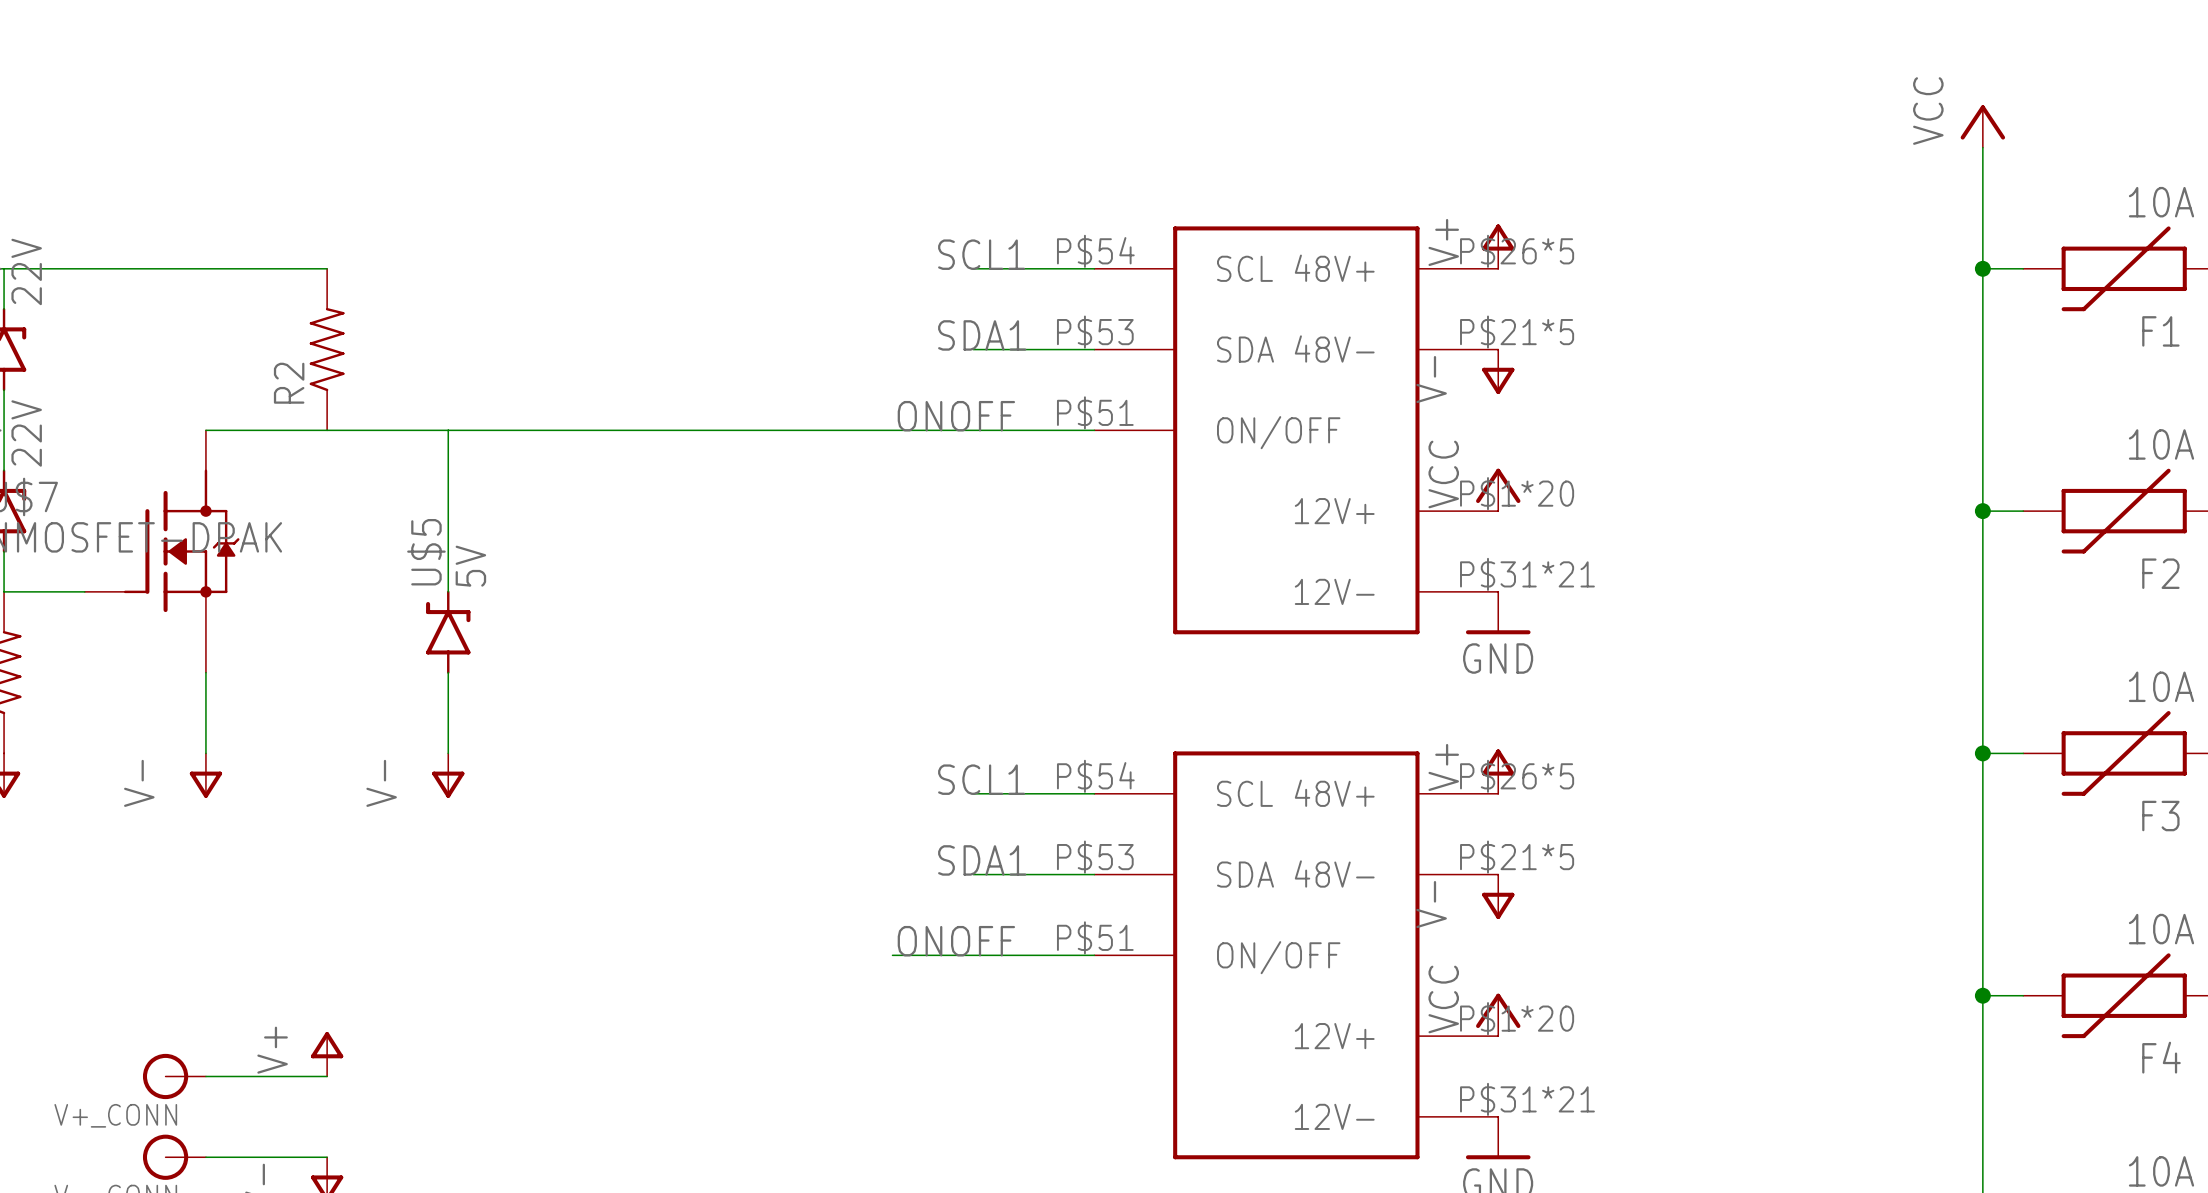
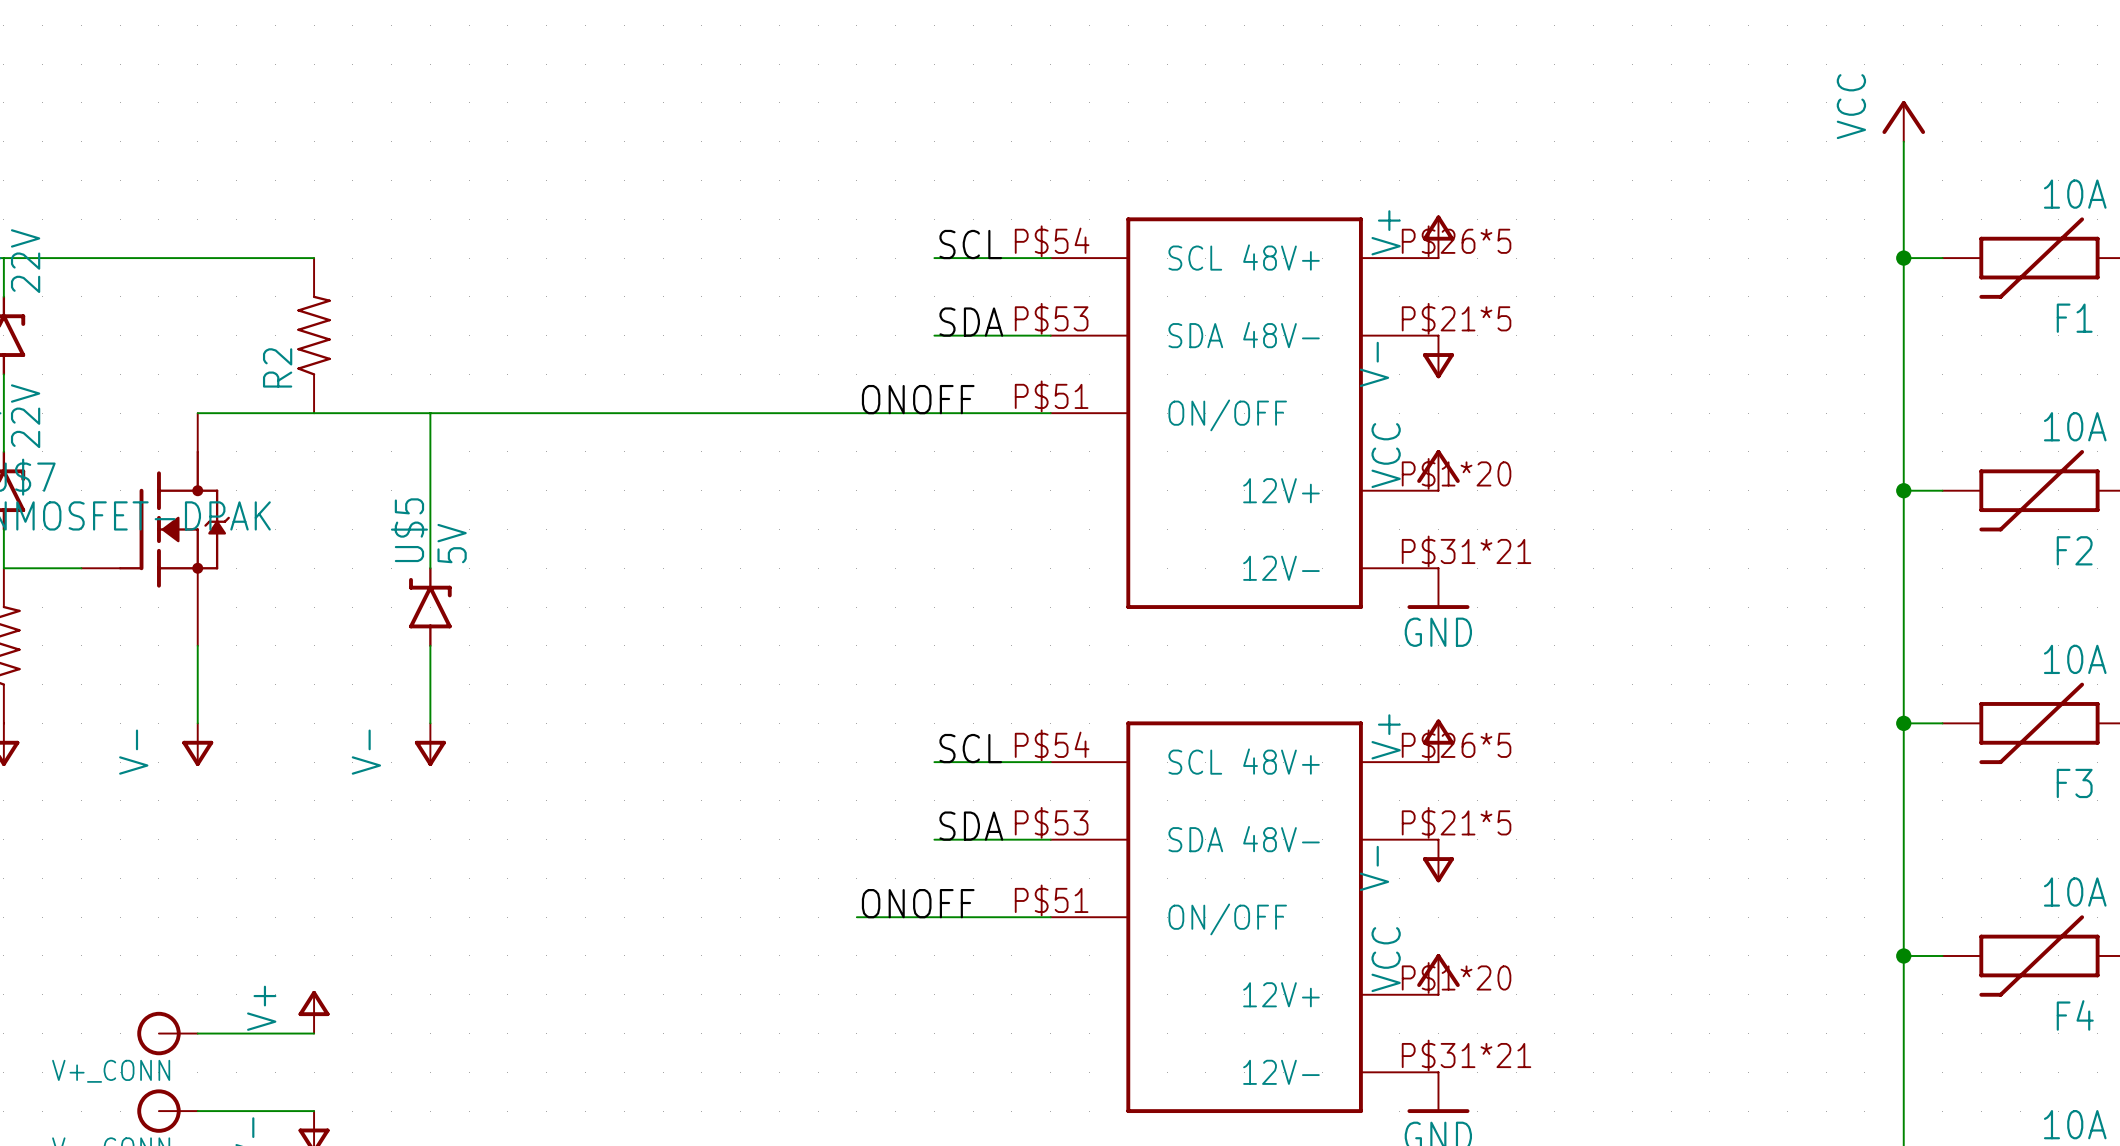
label: SCL1 (981, 254) -> SCL (970, 244)
label: SDA1 (982, 335) -> SDA (971, 322)
label: SCL1 (981, 779) -> SCL (970, 748)
label: SDA1 (982, 860) -> SDA (971, 826)

